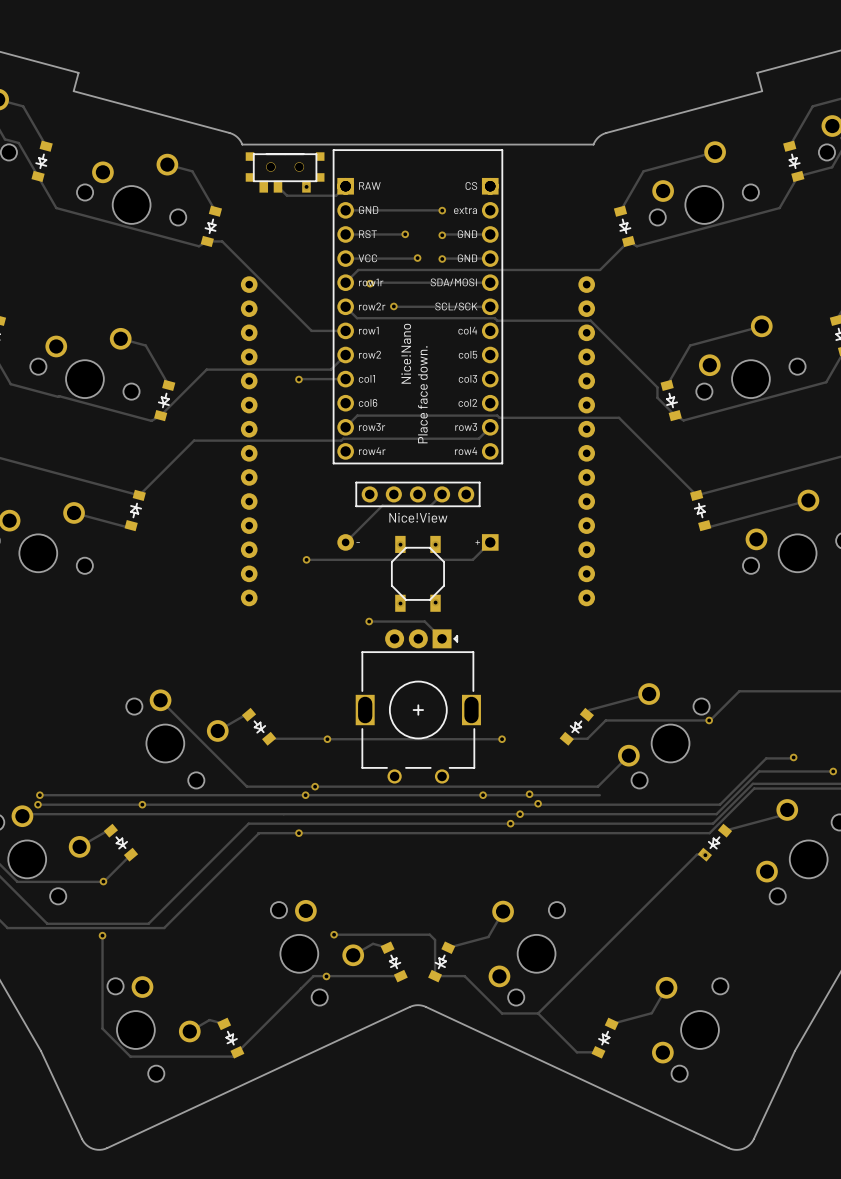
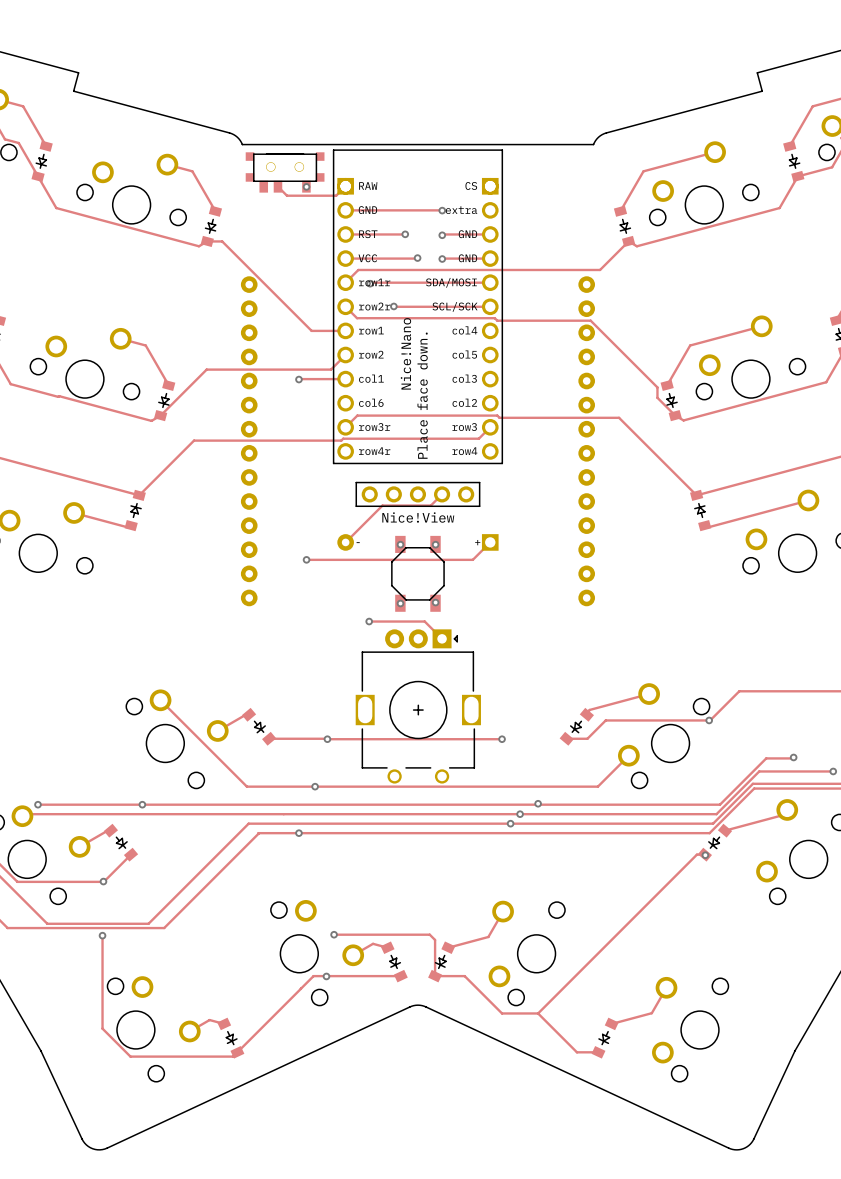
via: (529, 794) -> none
track: (39, 795) (599, 795) -> none
via: (39, 795) -> none
via: (305, 795) -> none
via: (483, 795) -> none

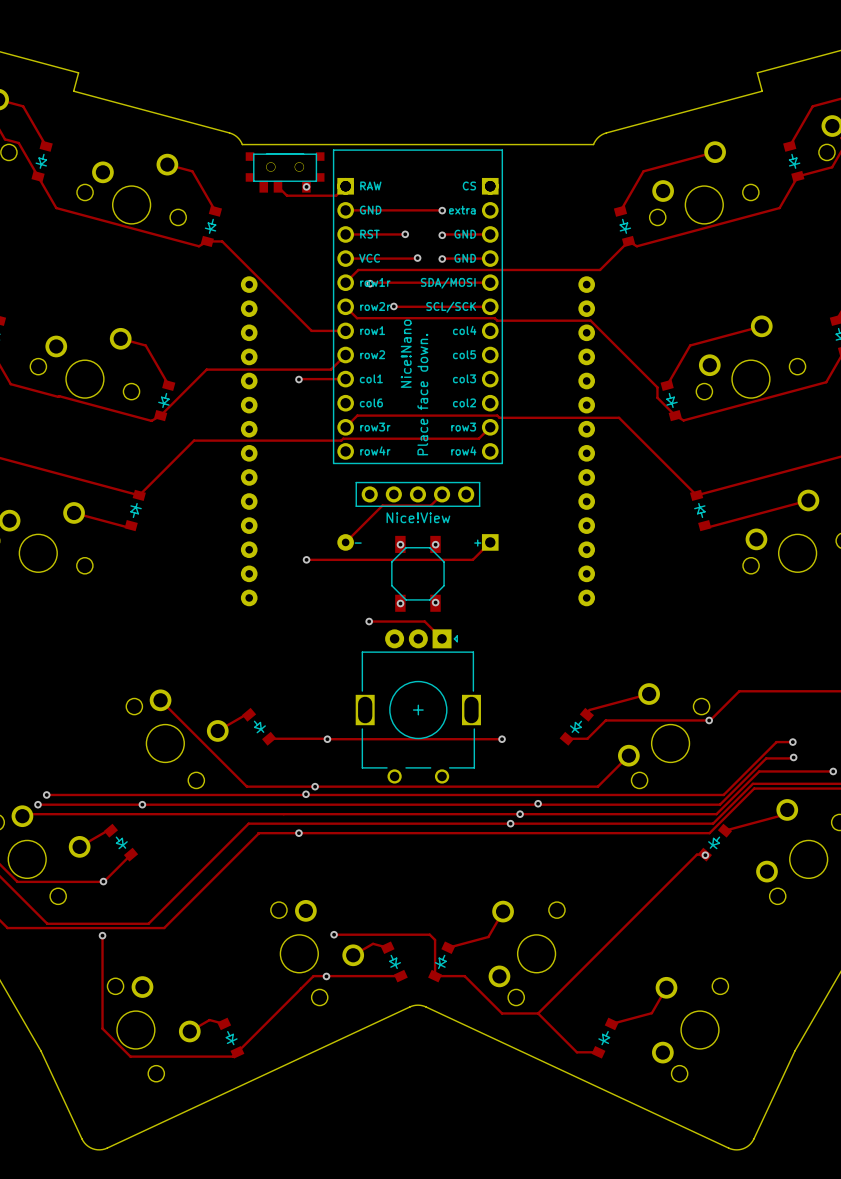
track: none -> (792, 742) (776, 742) (723, 794) (46, 794)
via: none -> (792, 742)
via: none -> (46, 794)
via: none -> (306, 794)

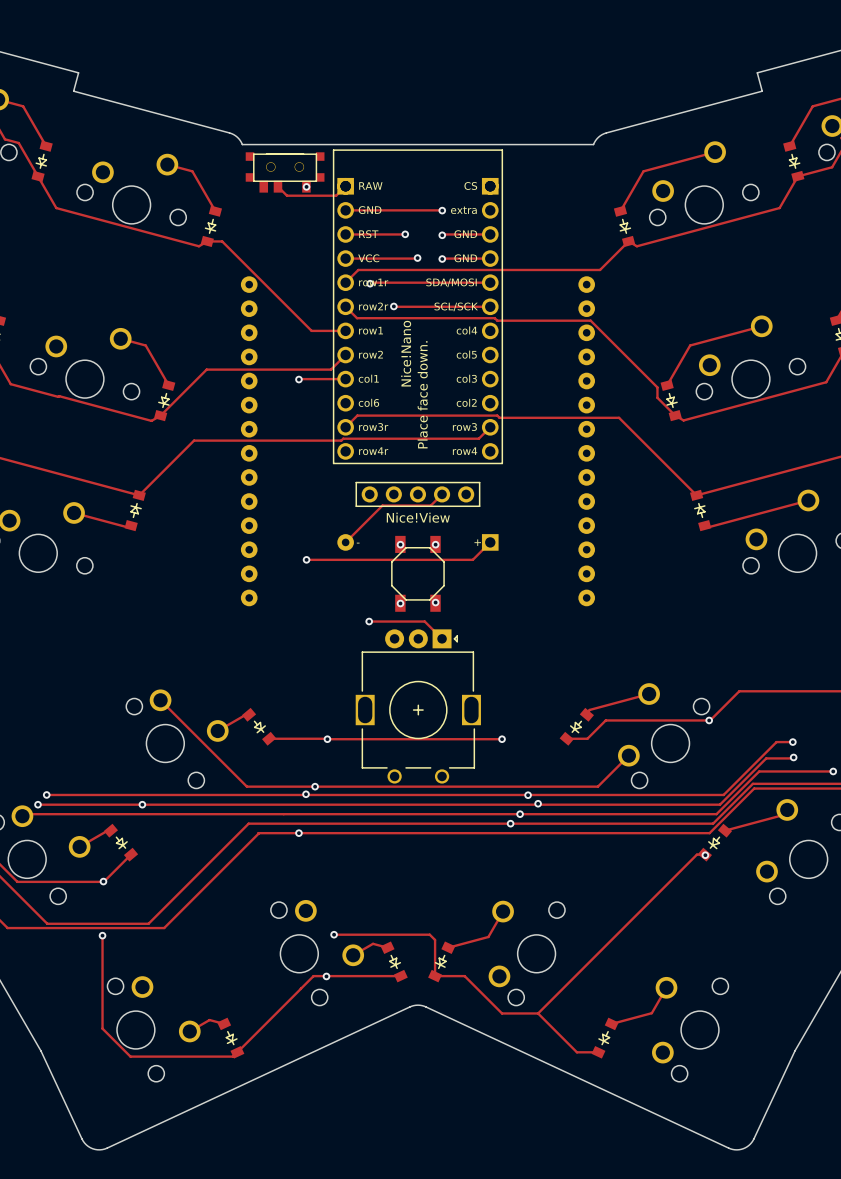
via: none -> (528, 795)

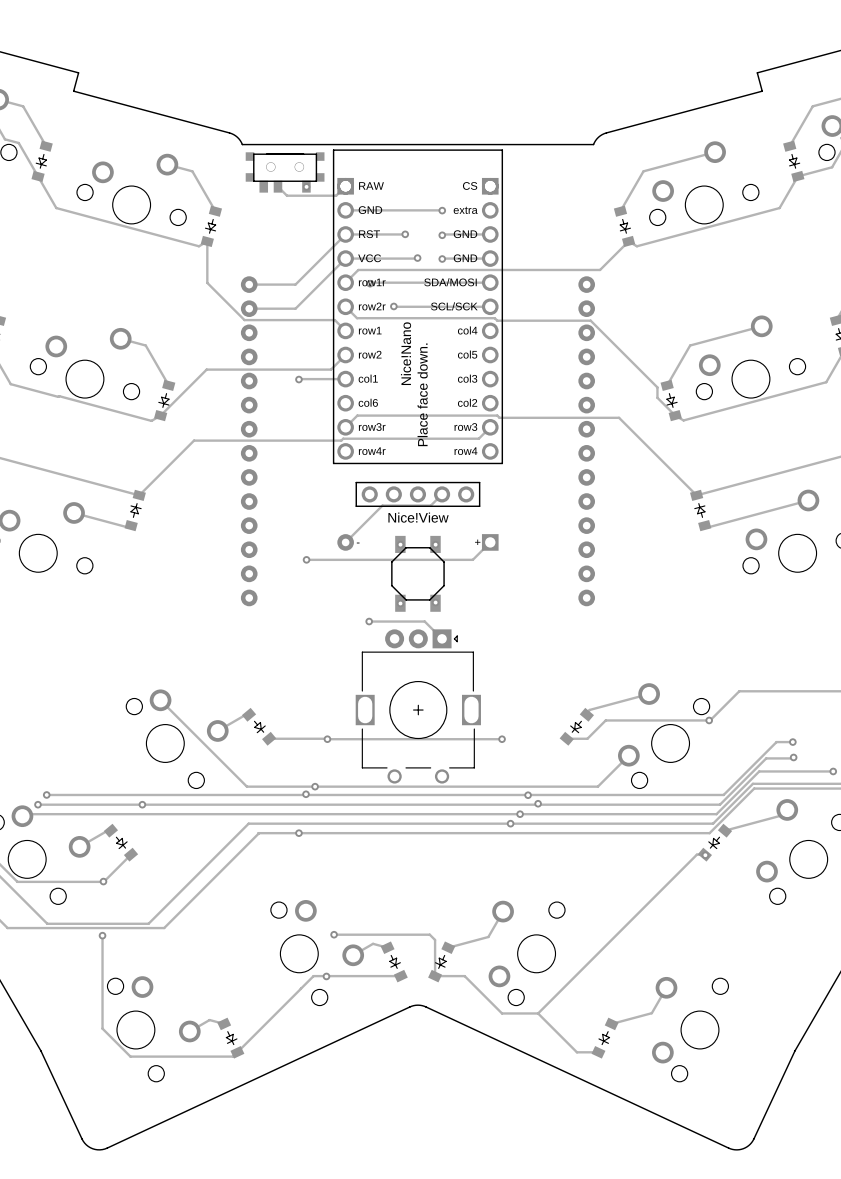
track: none -> (345, 234) (295, 284) (249, 284)
track: (207, 241) (222, 241) (311, 330) (345, 330) -> (207, 241) (207, 282) (244, 320) (334, 320) (345, 330)
track: none -> (345, 258) (295, 308) (249, 308)

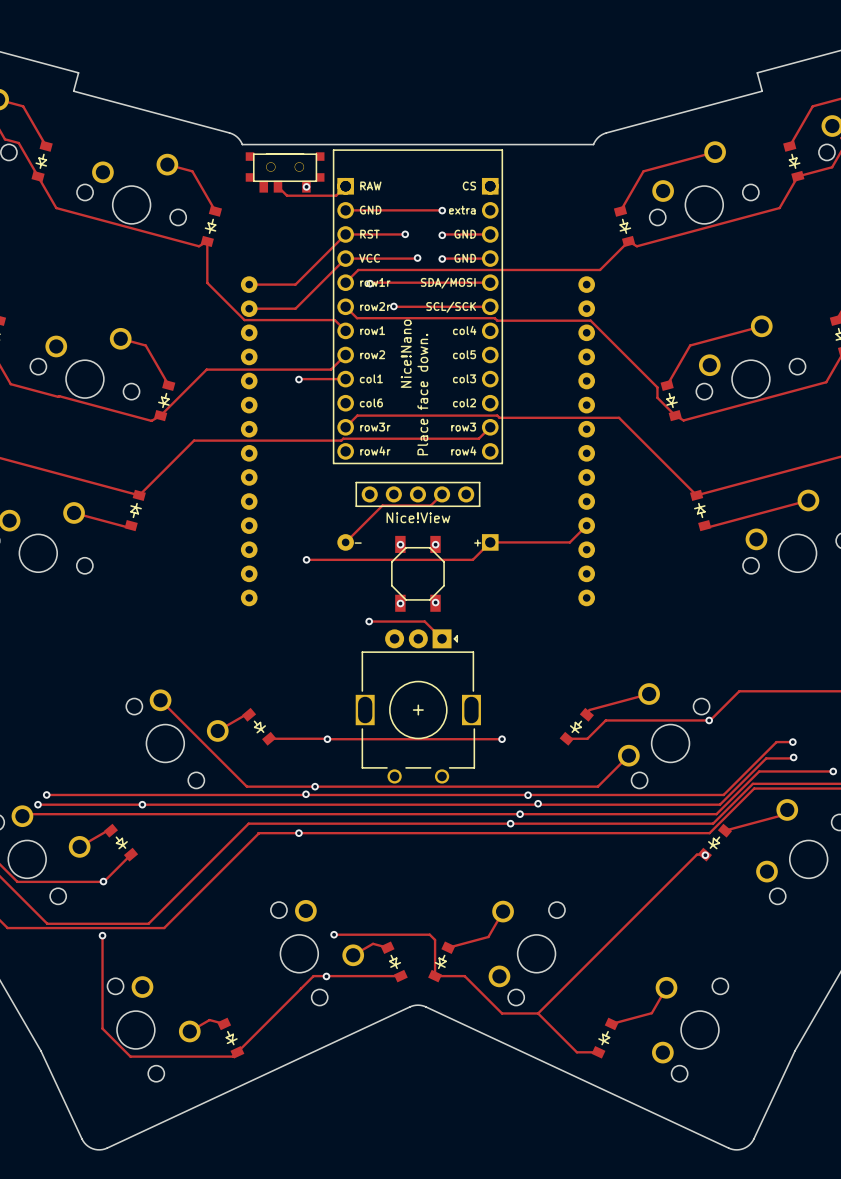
track: none -> (586, 525) (569, 542) (490, 542)

